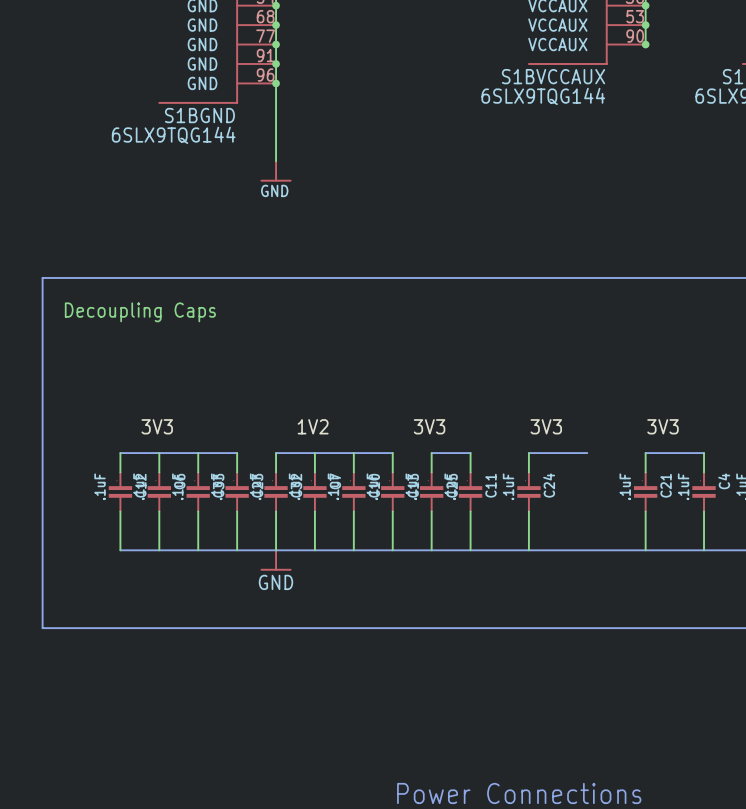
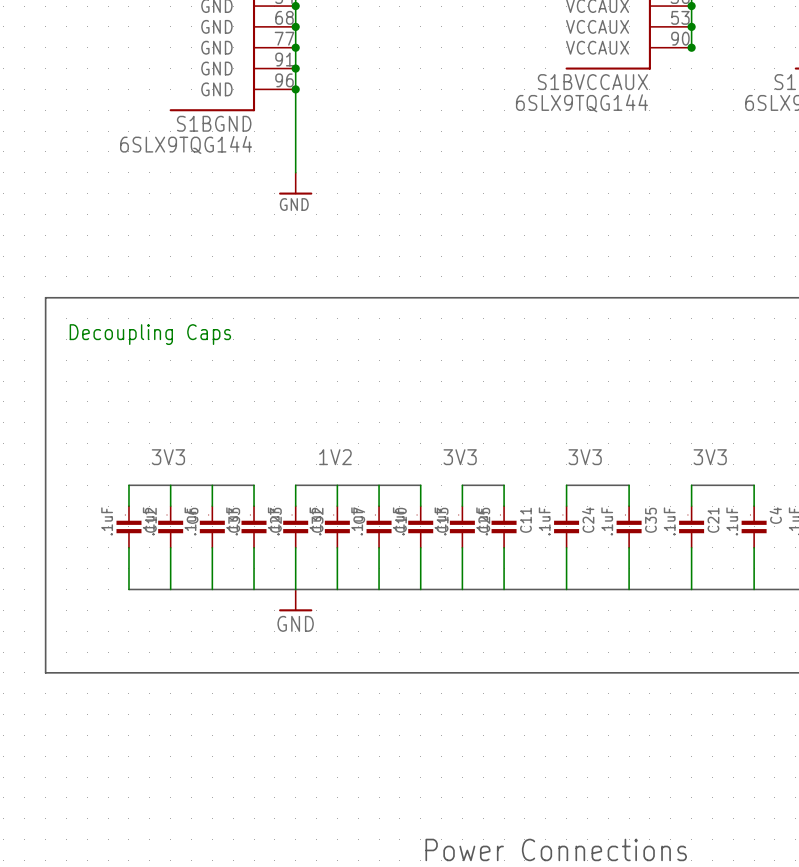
wire: none -> (629, 485) (629, 506)
C35: none -> .1uF (629, 526)
wire: none -> (629, 547) (629, 589)

